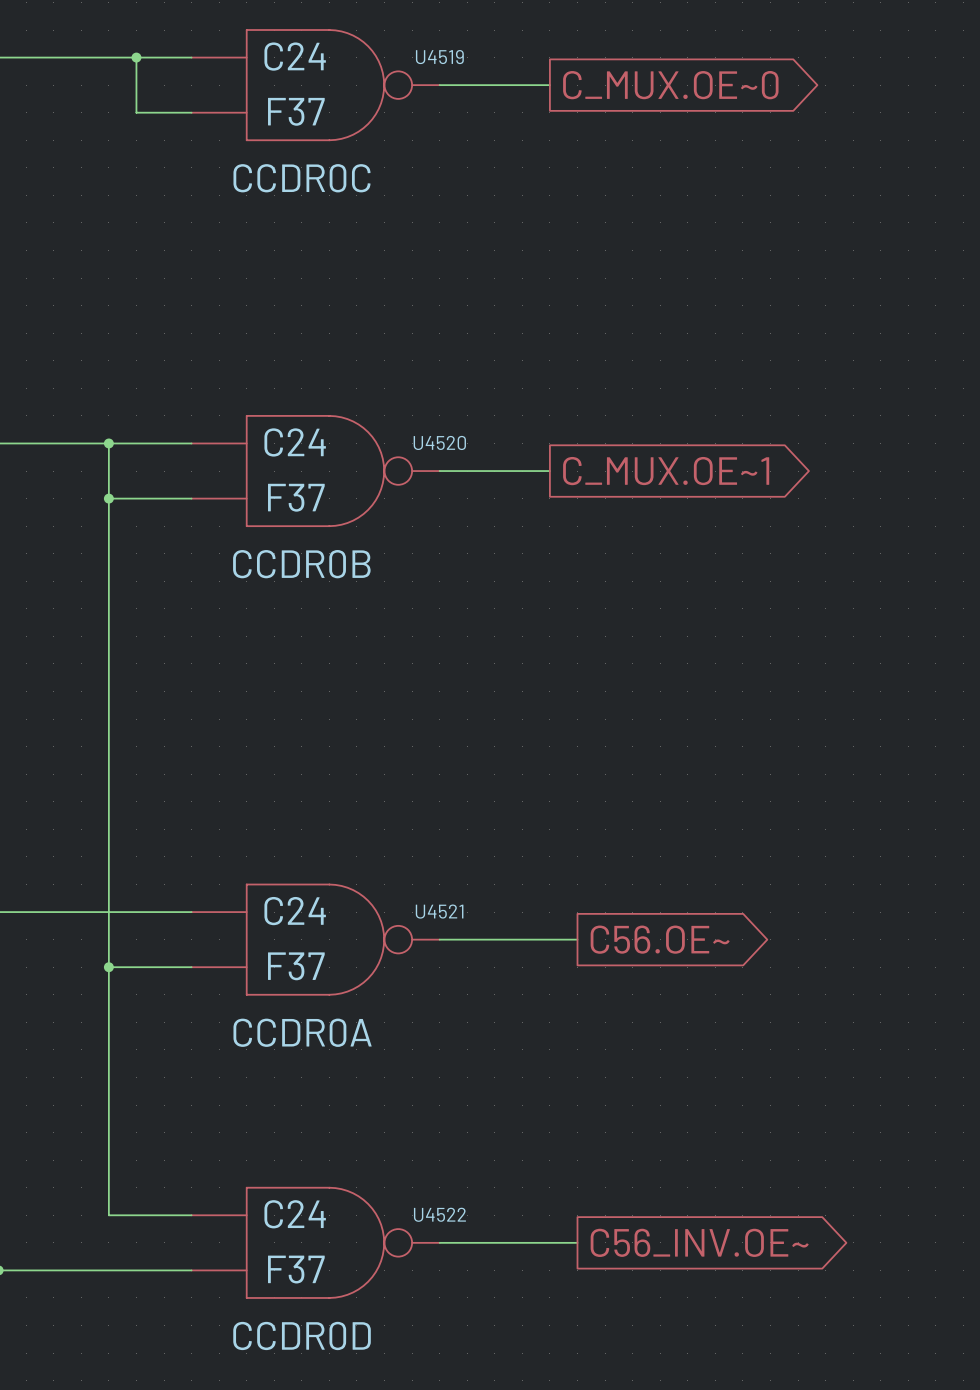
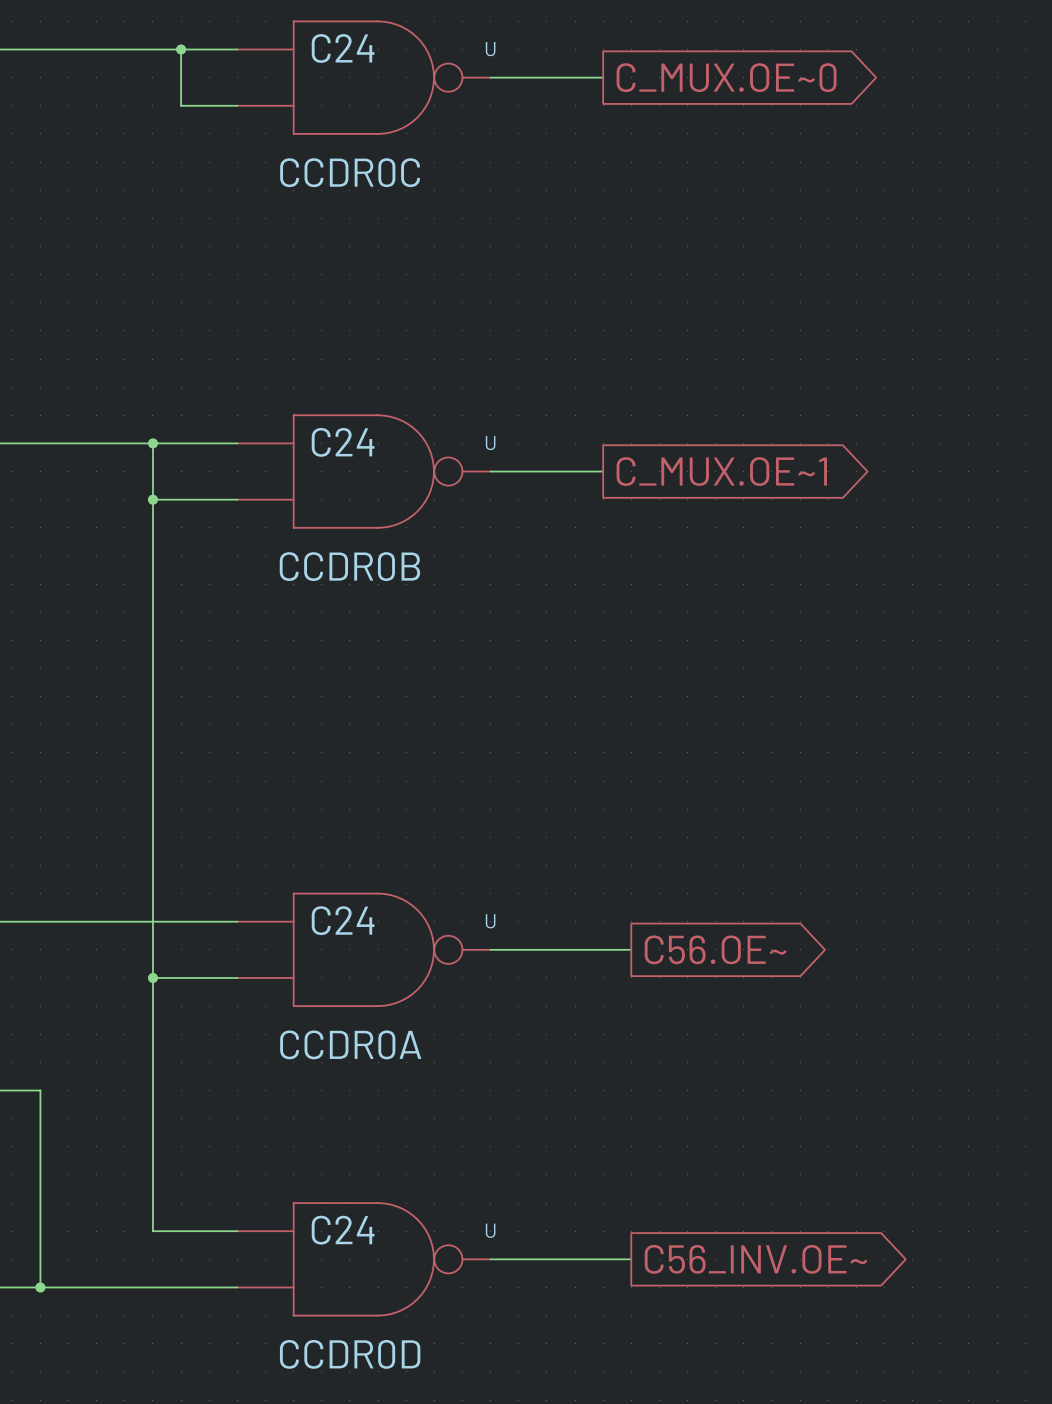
U4519 name: U4519 (439, 57) -> U (490, 49)
U4519 value: F37 (296, 111) -> none
U4520 name: U4520 (439, 442) -> U (490, 442)
U4520 value: F37 (296, 497) -> none
U4521 name: U4521 (439, 911) -> U (490, 921)
U4521 value: F37 (296, 966) -> none
U4522 name: U4522 (439, 1214) -> U (490, 1230)
U4522 value: F37 (296, 1269) -> none

